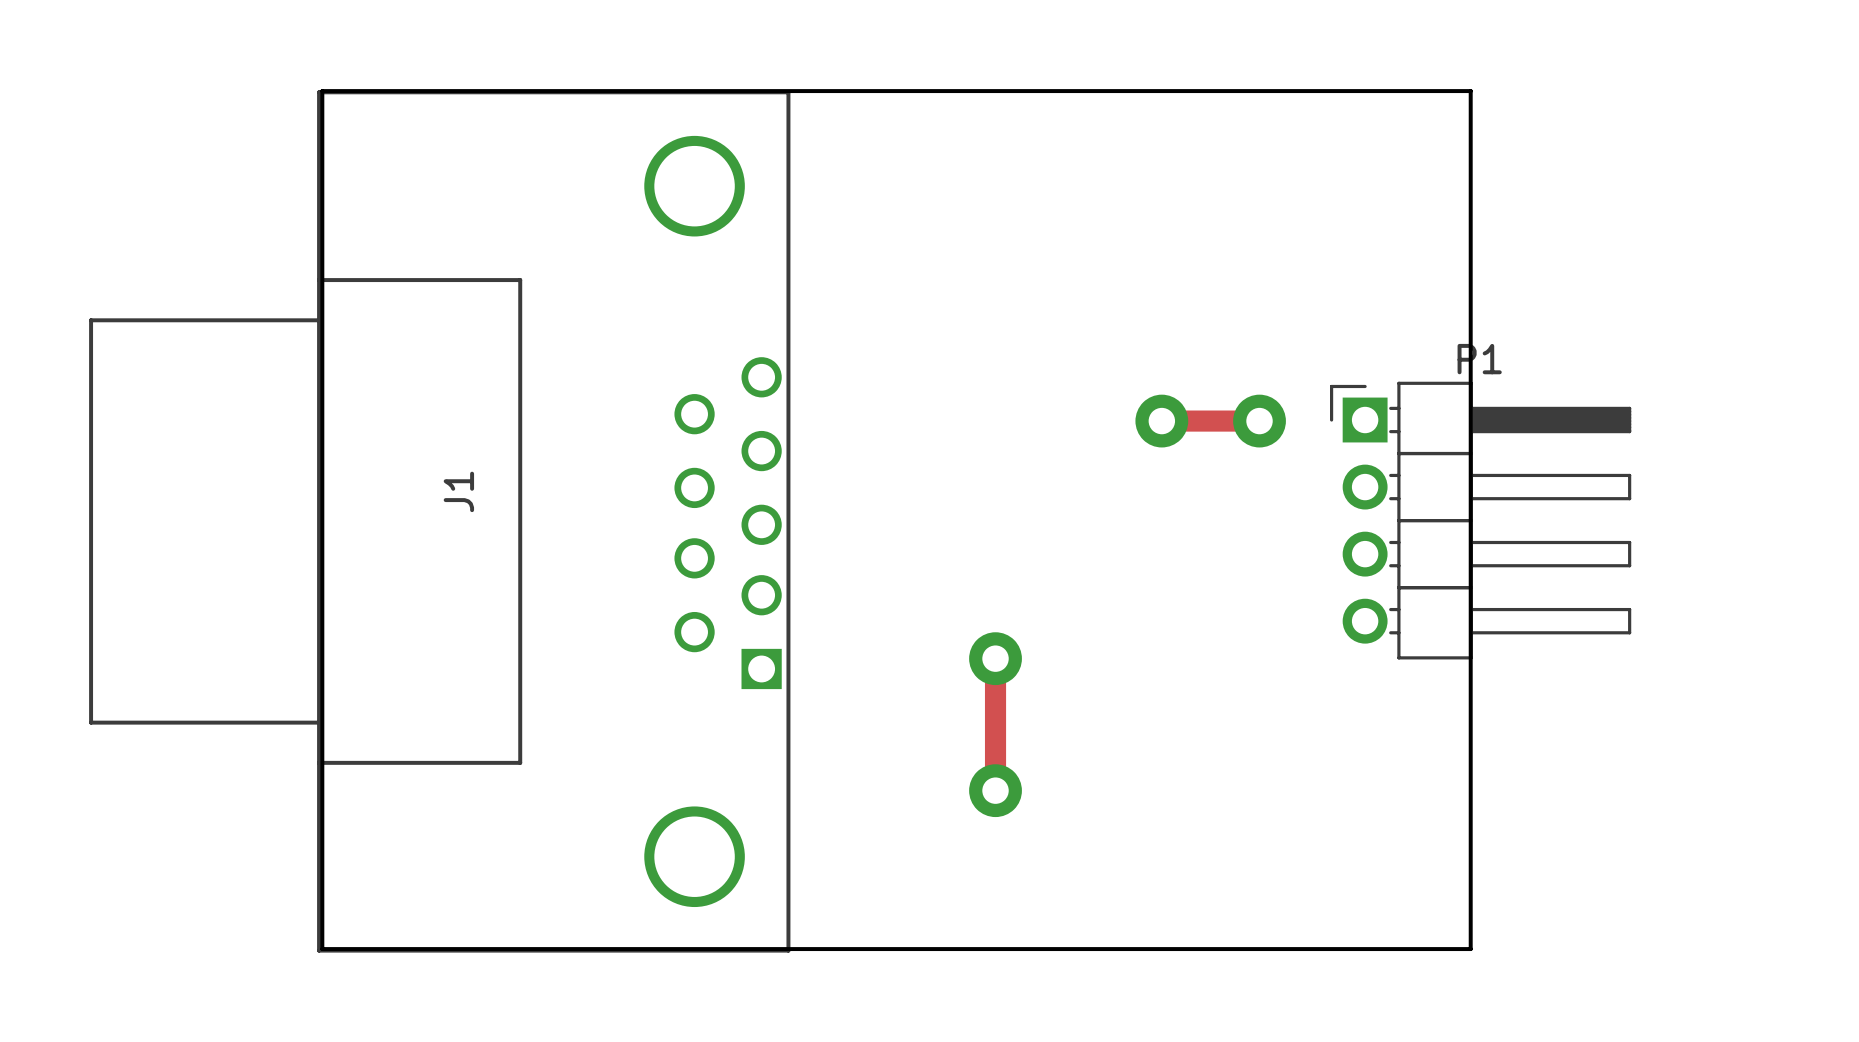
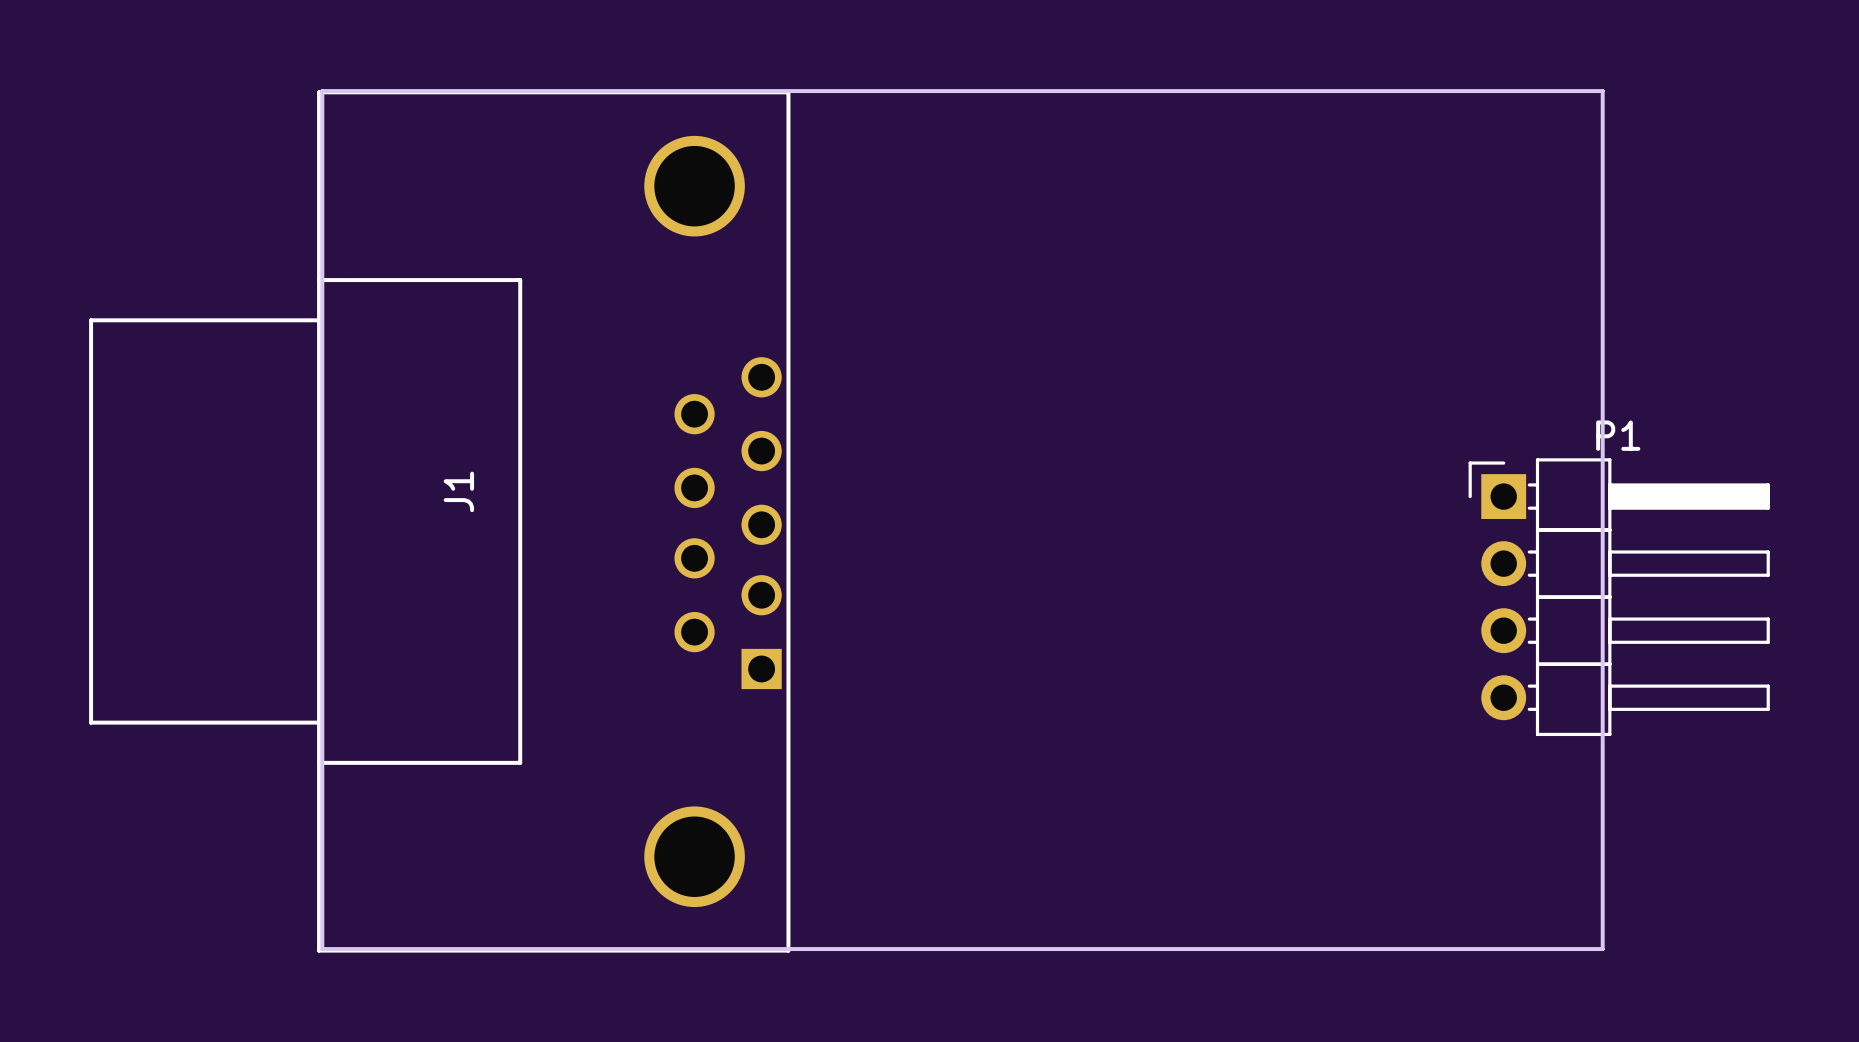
board edge: (1470, 91) (1470, 949) -> (1470, 91) (1602, 91) (1602, 949) (1470, 949)
track: (1161, 421) (1259, 421) -> none
via: (1161, 421) -> none
via: (1259, 421) -> none
P1 position: (1480, 520) -> (1619, 597)
track: (995, 658) (995, 790) -> none
via: (995, 658) -> none
via: (995, 790) -> none

